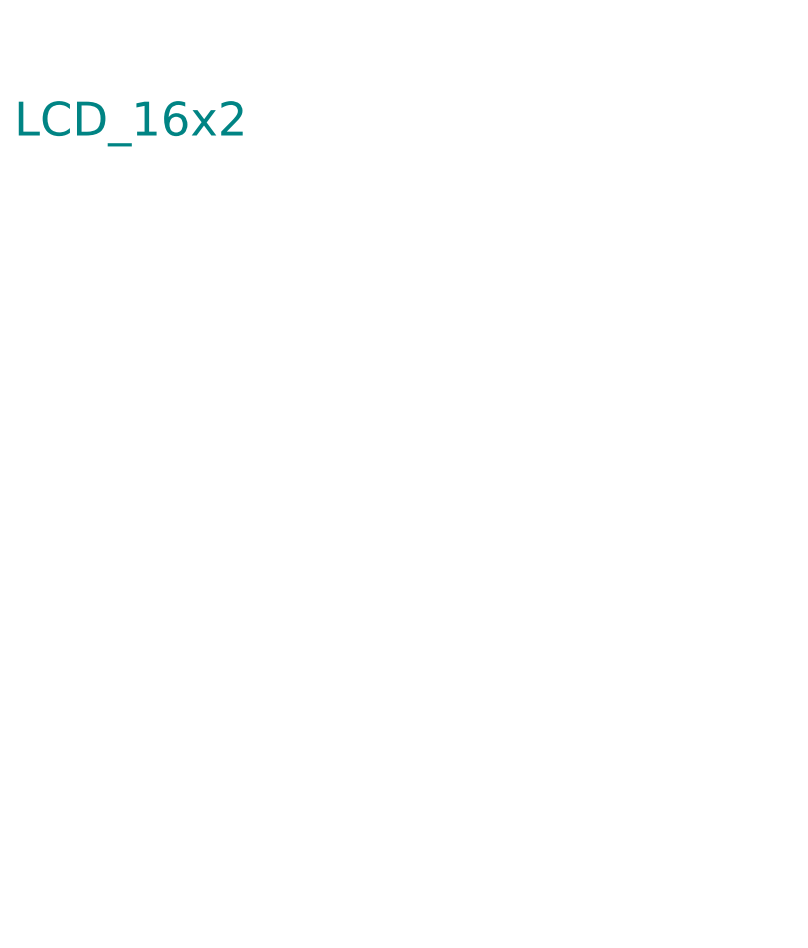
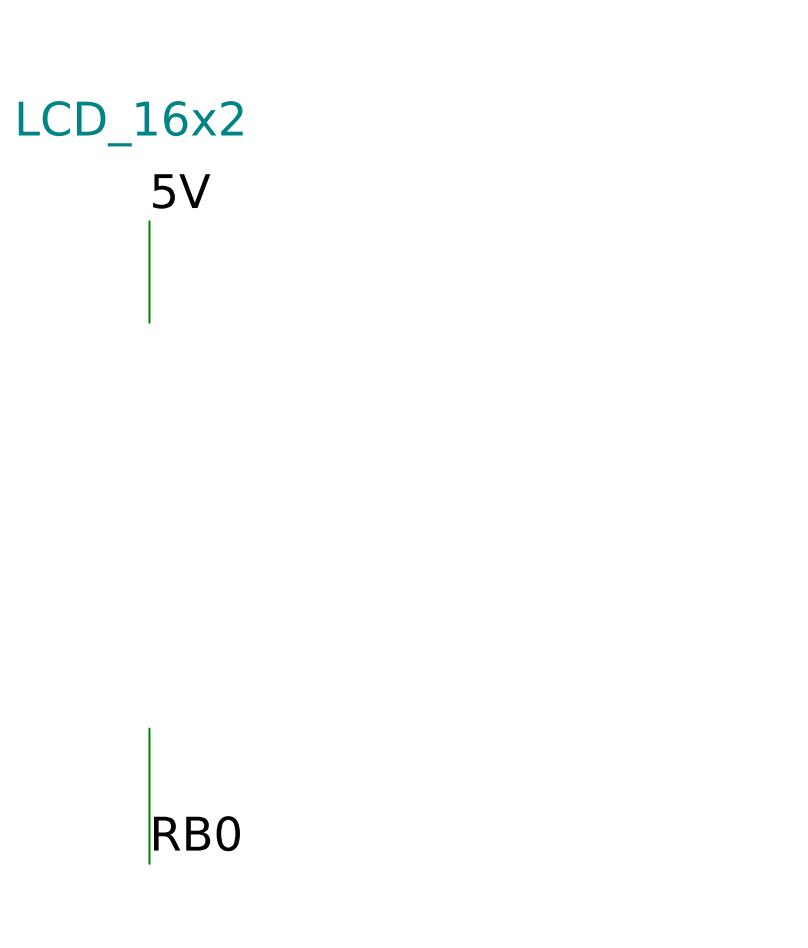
label: none -> 5V (181, 191)
wire: none -> (149, 221) (149, 322)
wire: none -> (149, 728) (149, 863)
label: none -> RB0 (196, 833)

